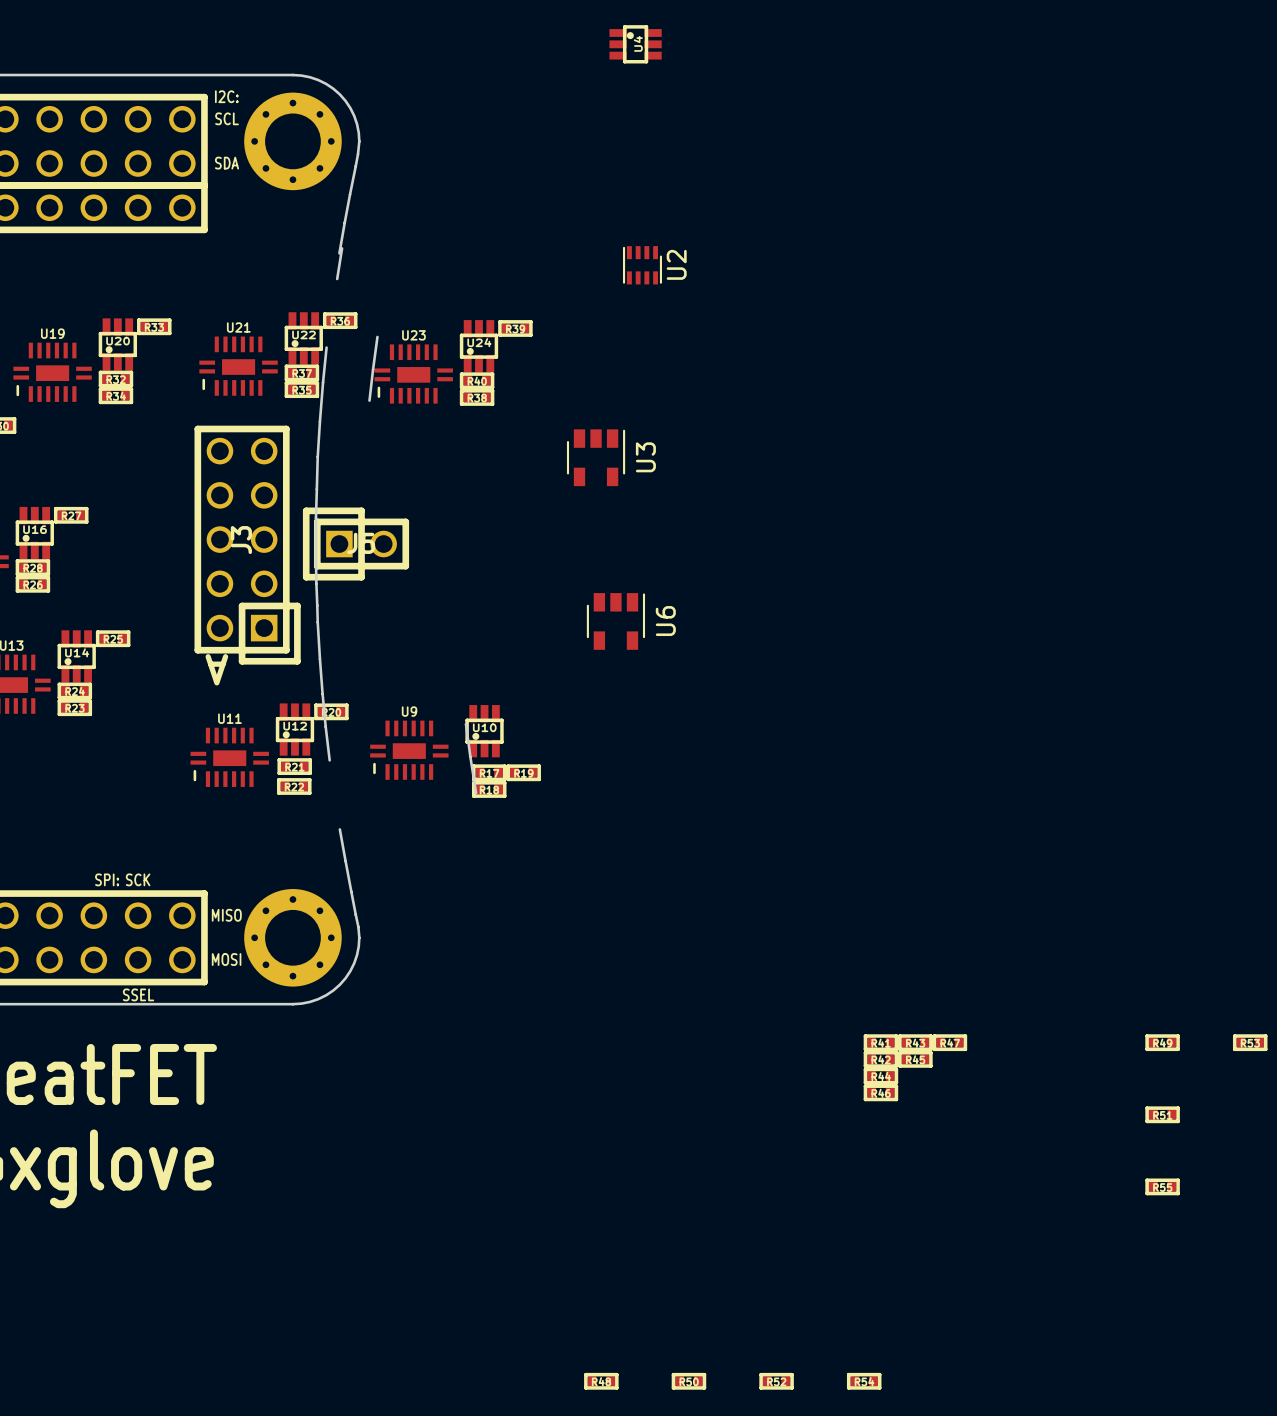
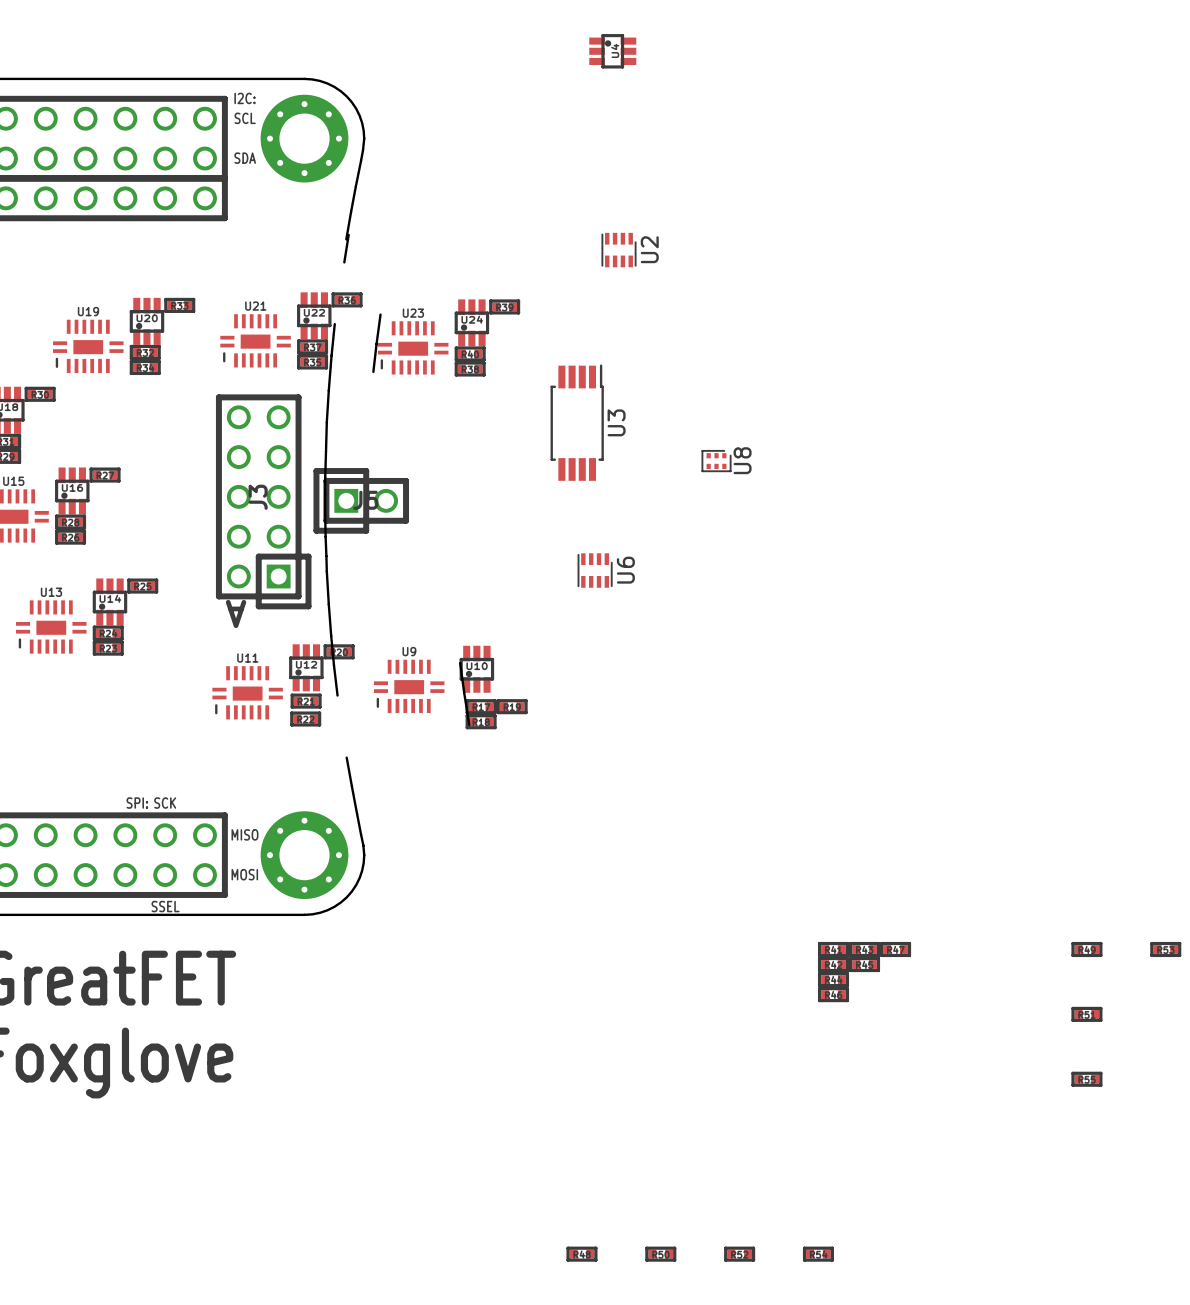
U3 footprint: [566, 429, 626, 487] -> [550, 364, 604, 481]
U8: none -> (716, 461)
U6 footprint: [586, 593, 646, 650] -> [577, 553, 613, 588]

